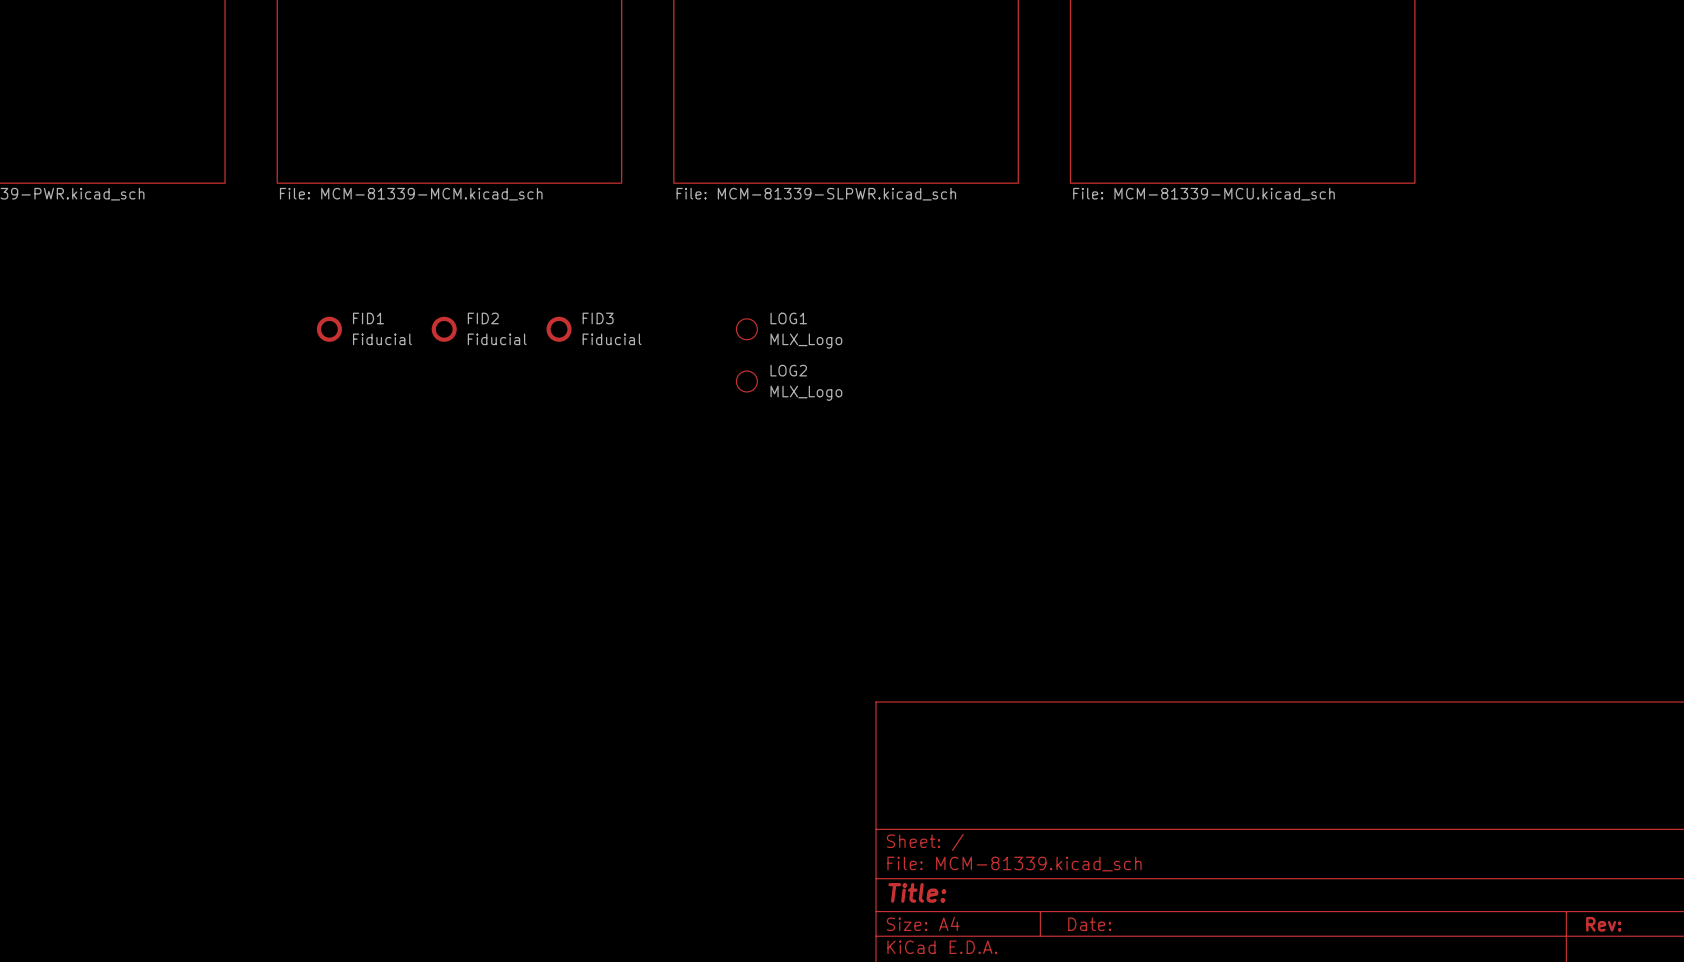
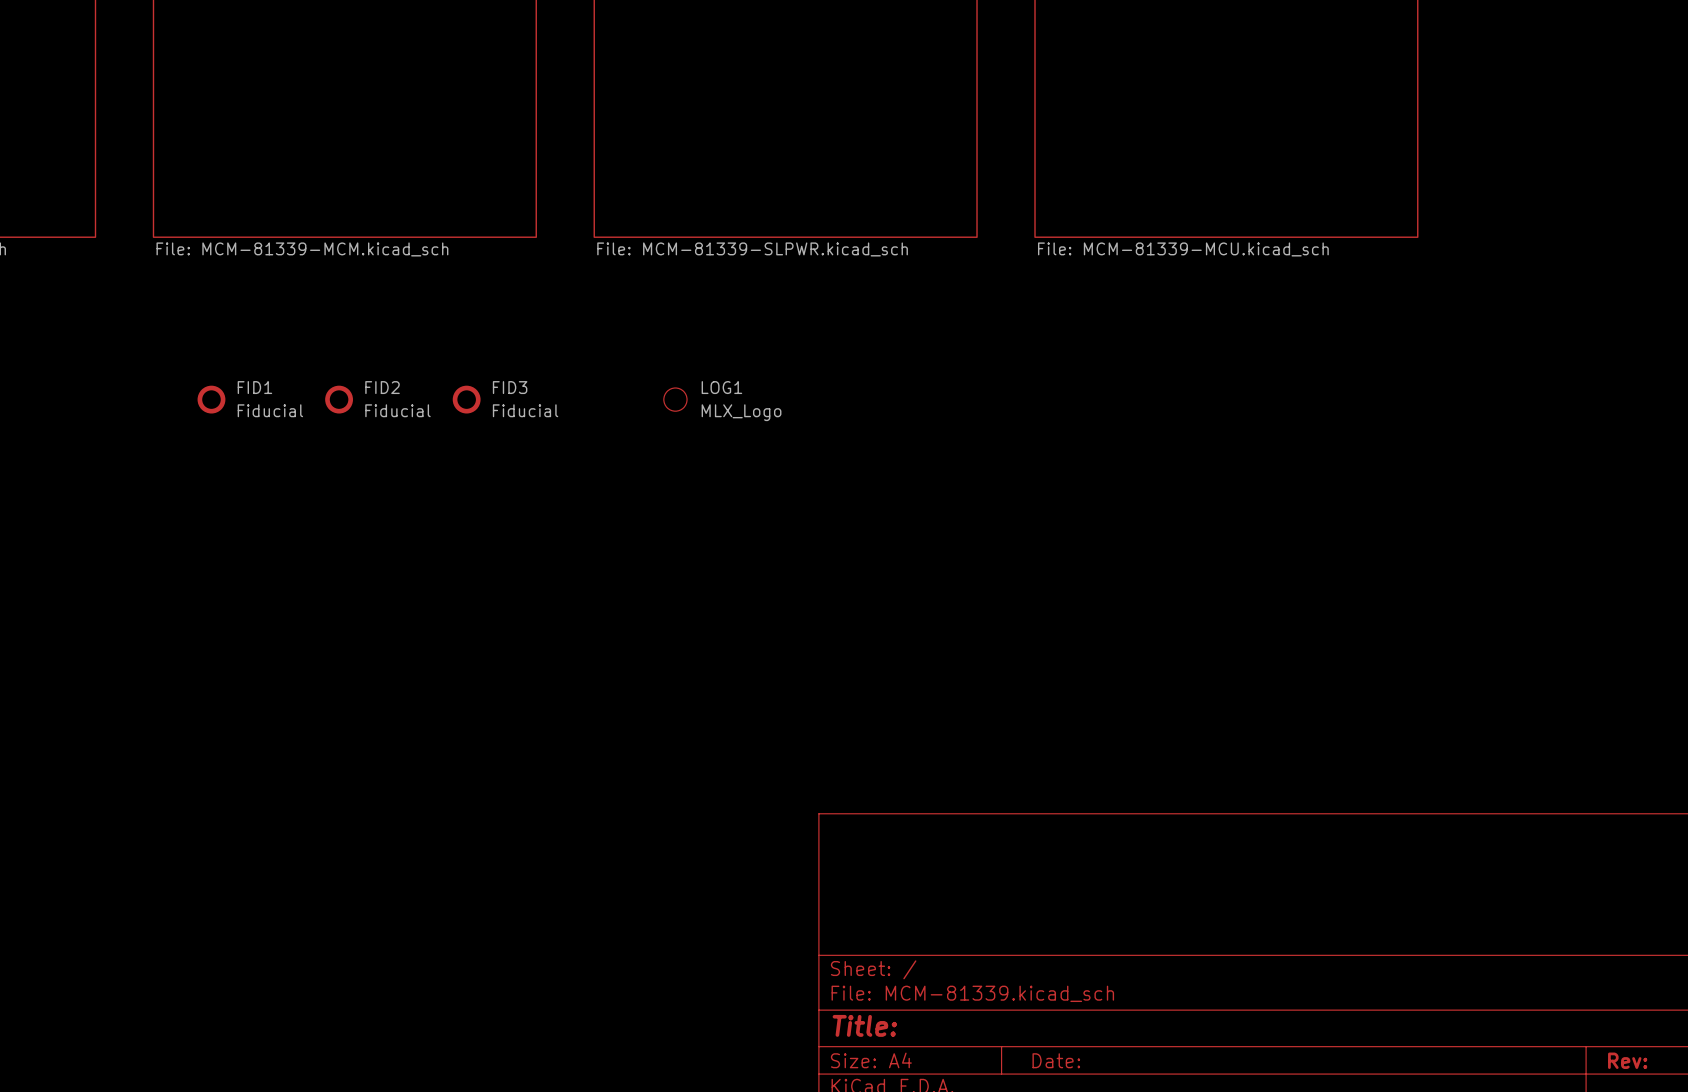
LOG2: MLX_Logo (746, 381) -> none

